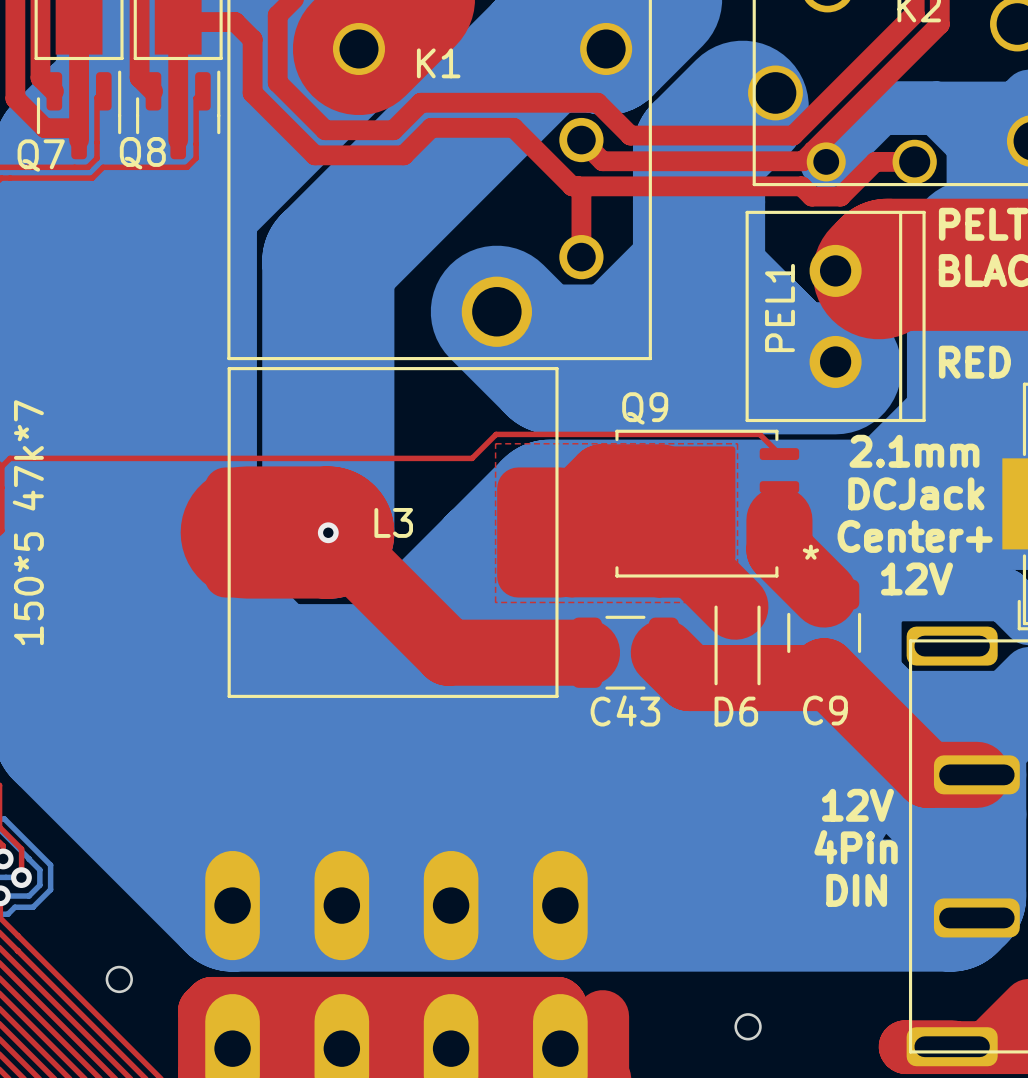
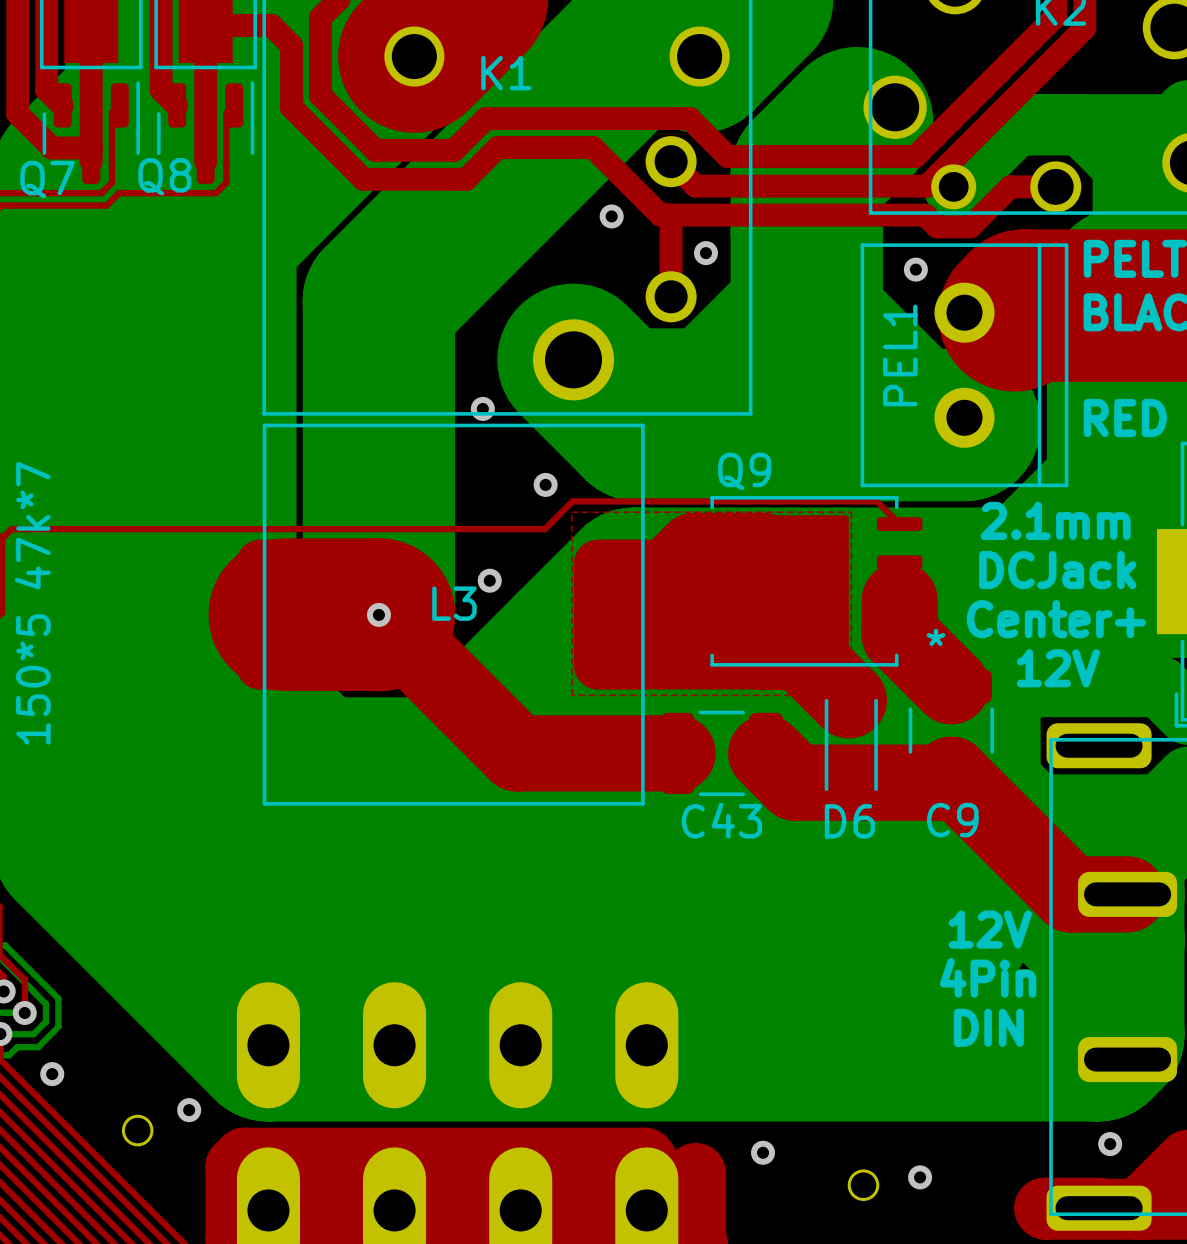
via: none -> (611, 216)
via: none -> (705, 253)
via: none -> (915, 269)
via: none -> (482, 408)
via: none -> (545, 484)
via: none -> (489, 580)
via: none -> (52, 1074)
via: none -> (189, 1110)
via: none -> (1110, 1144)
via: none -> (763, 1152)
via: none -> (920, 1177)

